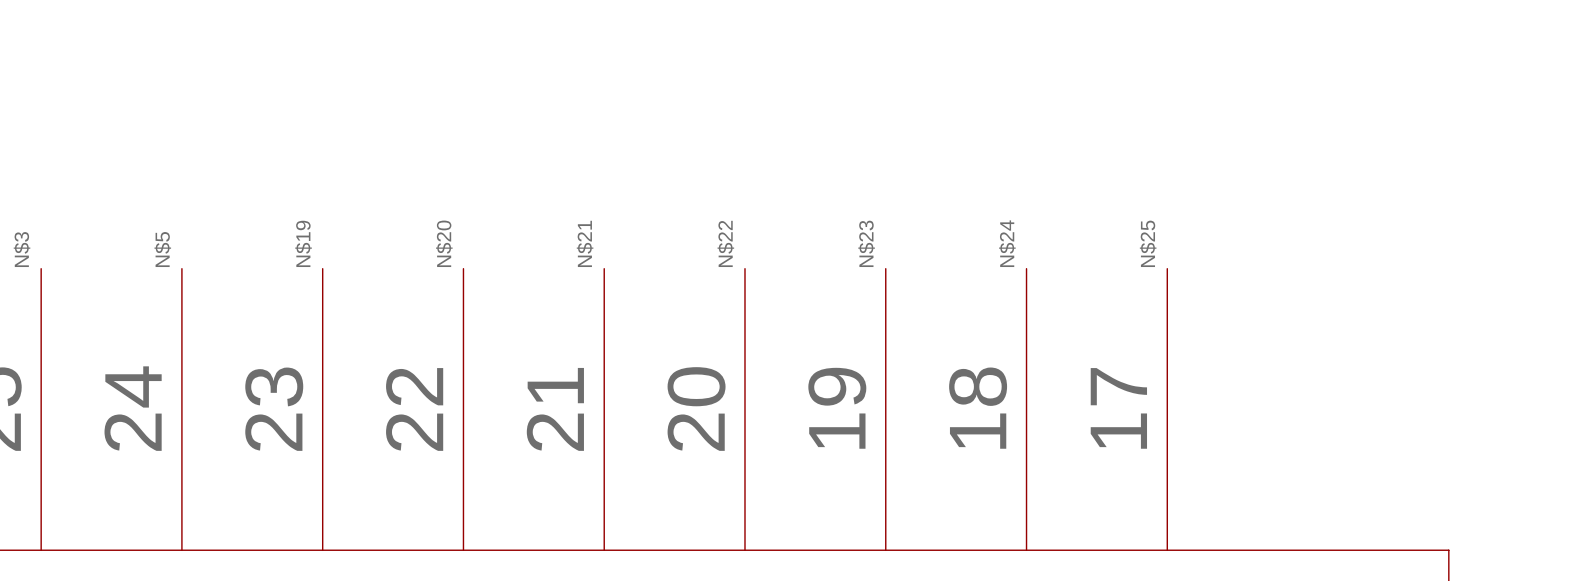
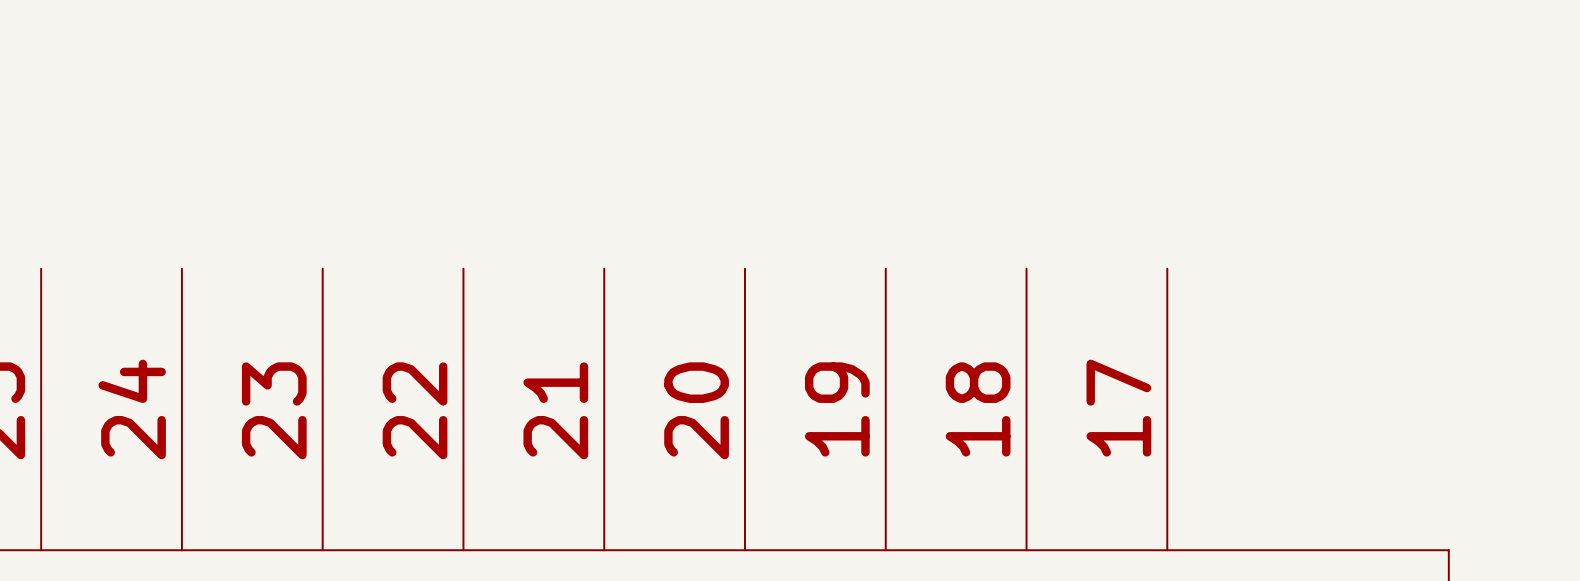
label: N$19 (303, 243) -> none
label: N$20 (444, 243) -> none
label: N$21 (585, 243) -> none
label: N$22 (725, 243) -> none
label: N$23 (866, 243) -> none
label: N$24 (1007, 243) -> none
label: N$25 (1148, 243) -> none
label: N$3 (22, 249) -> none
label: N$5 (162, 249) -> none

